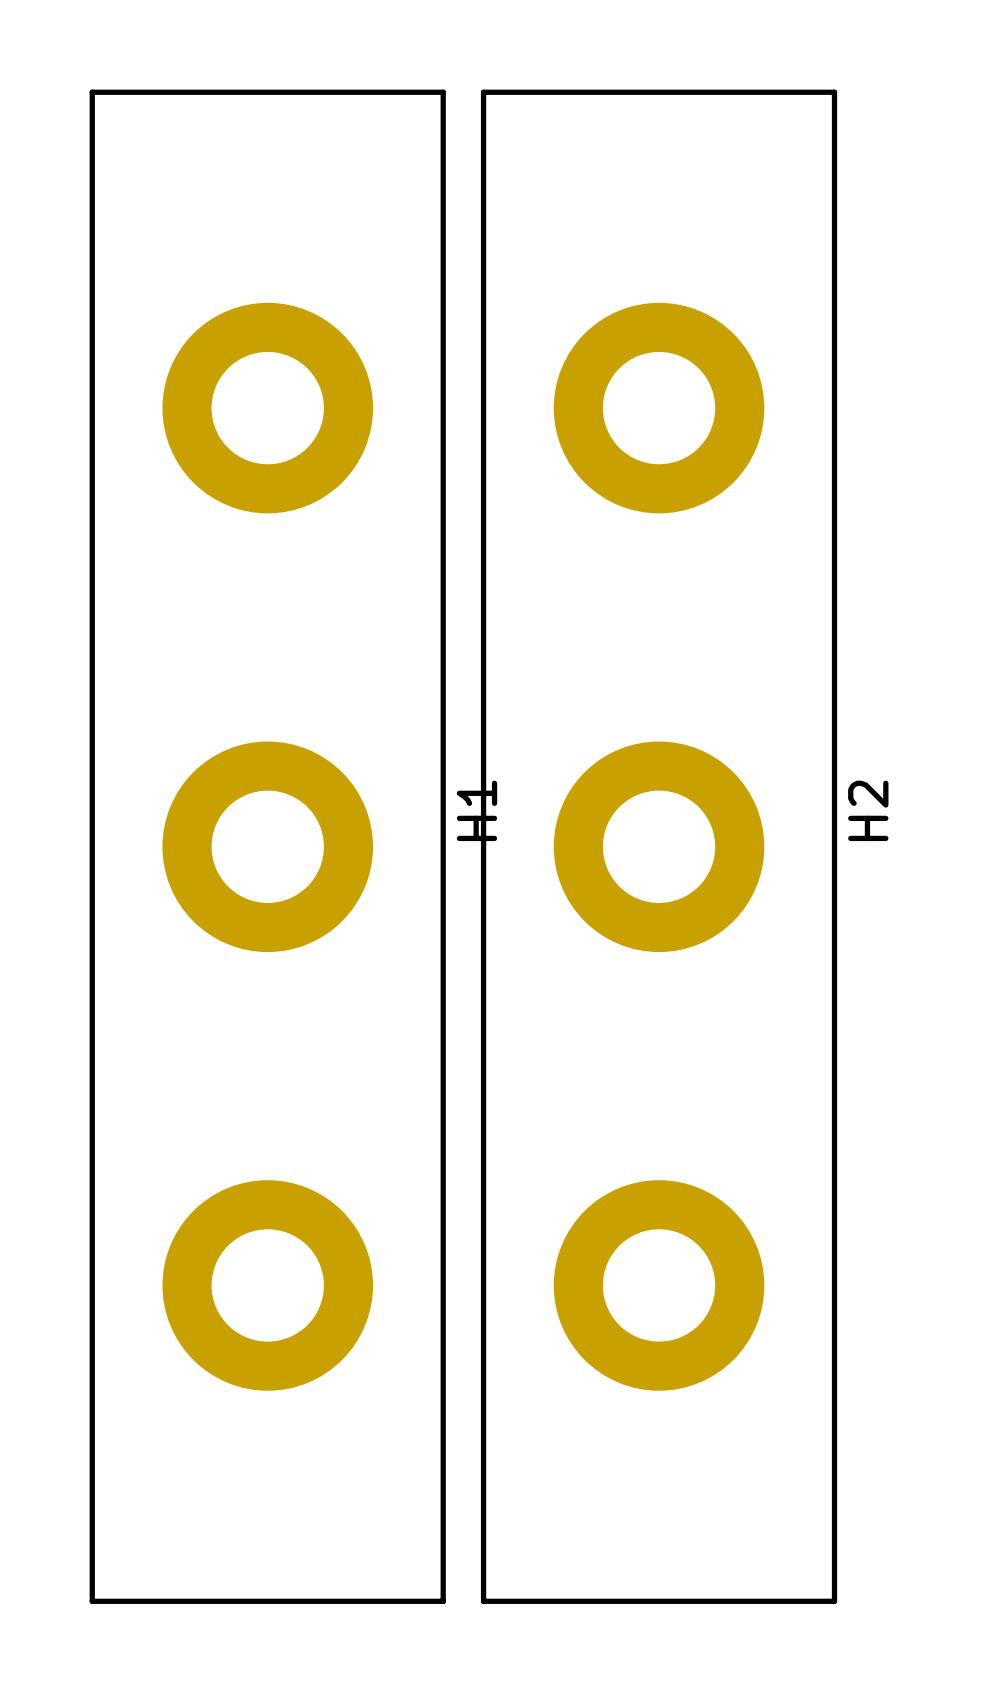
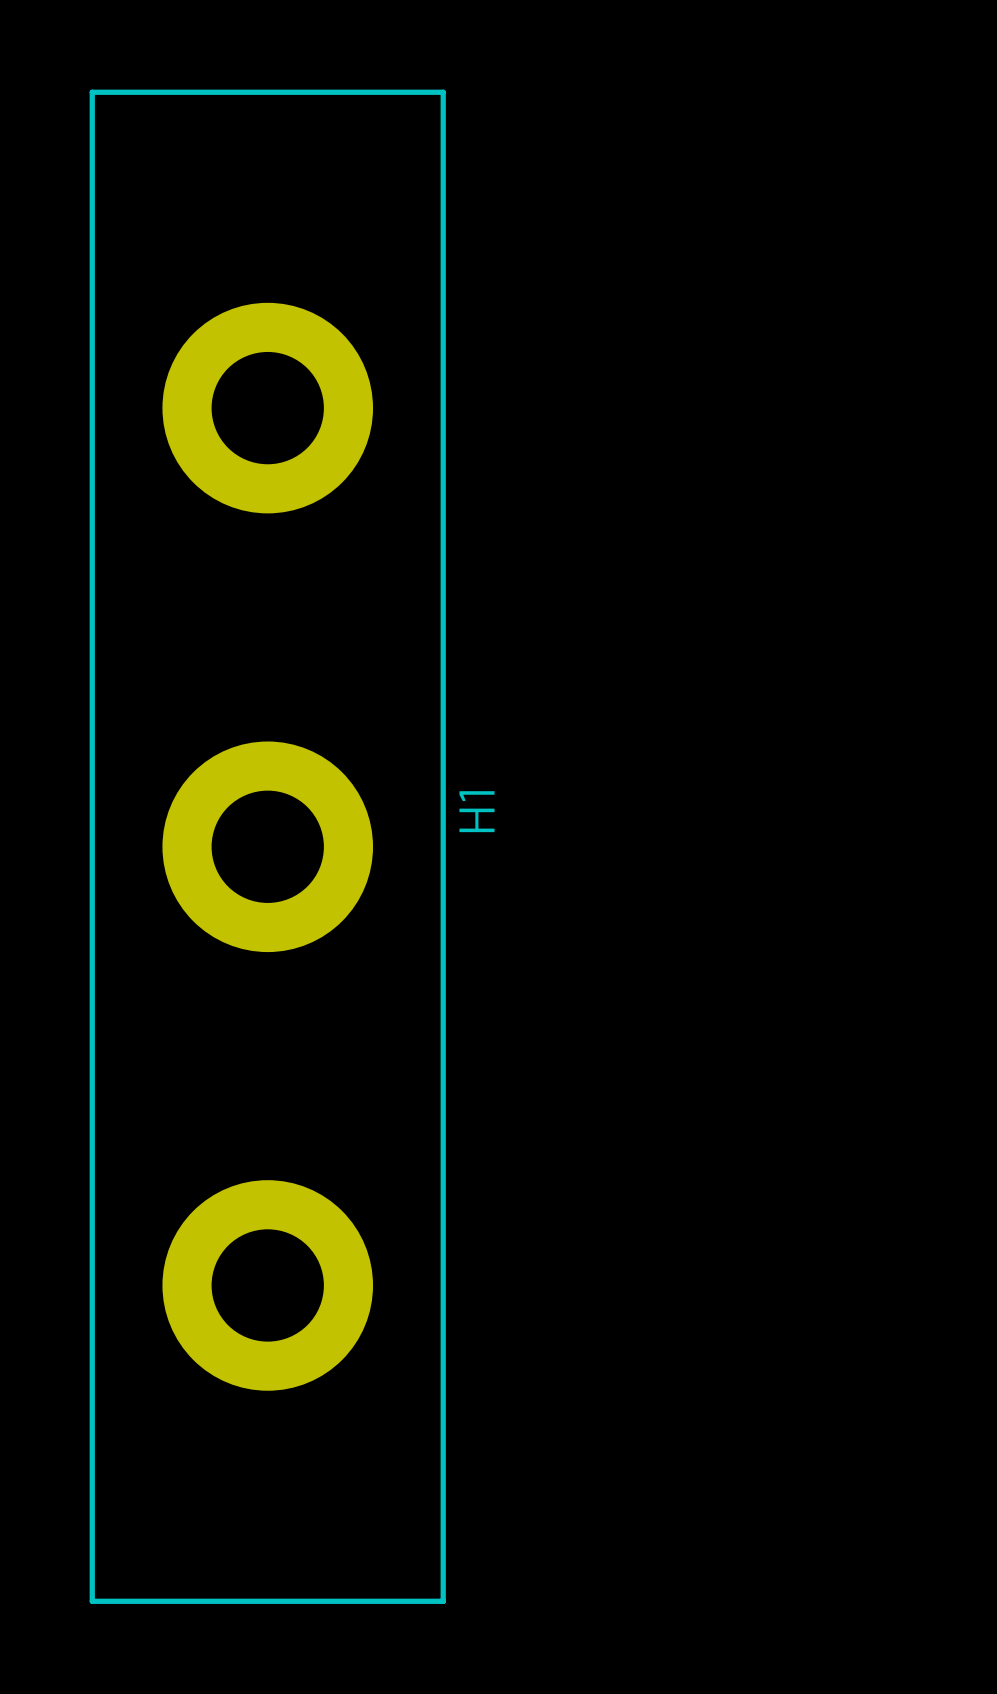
H2: (659, 846) -> none

